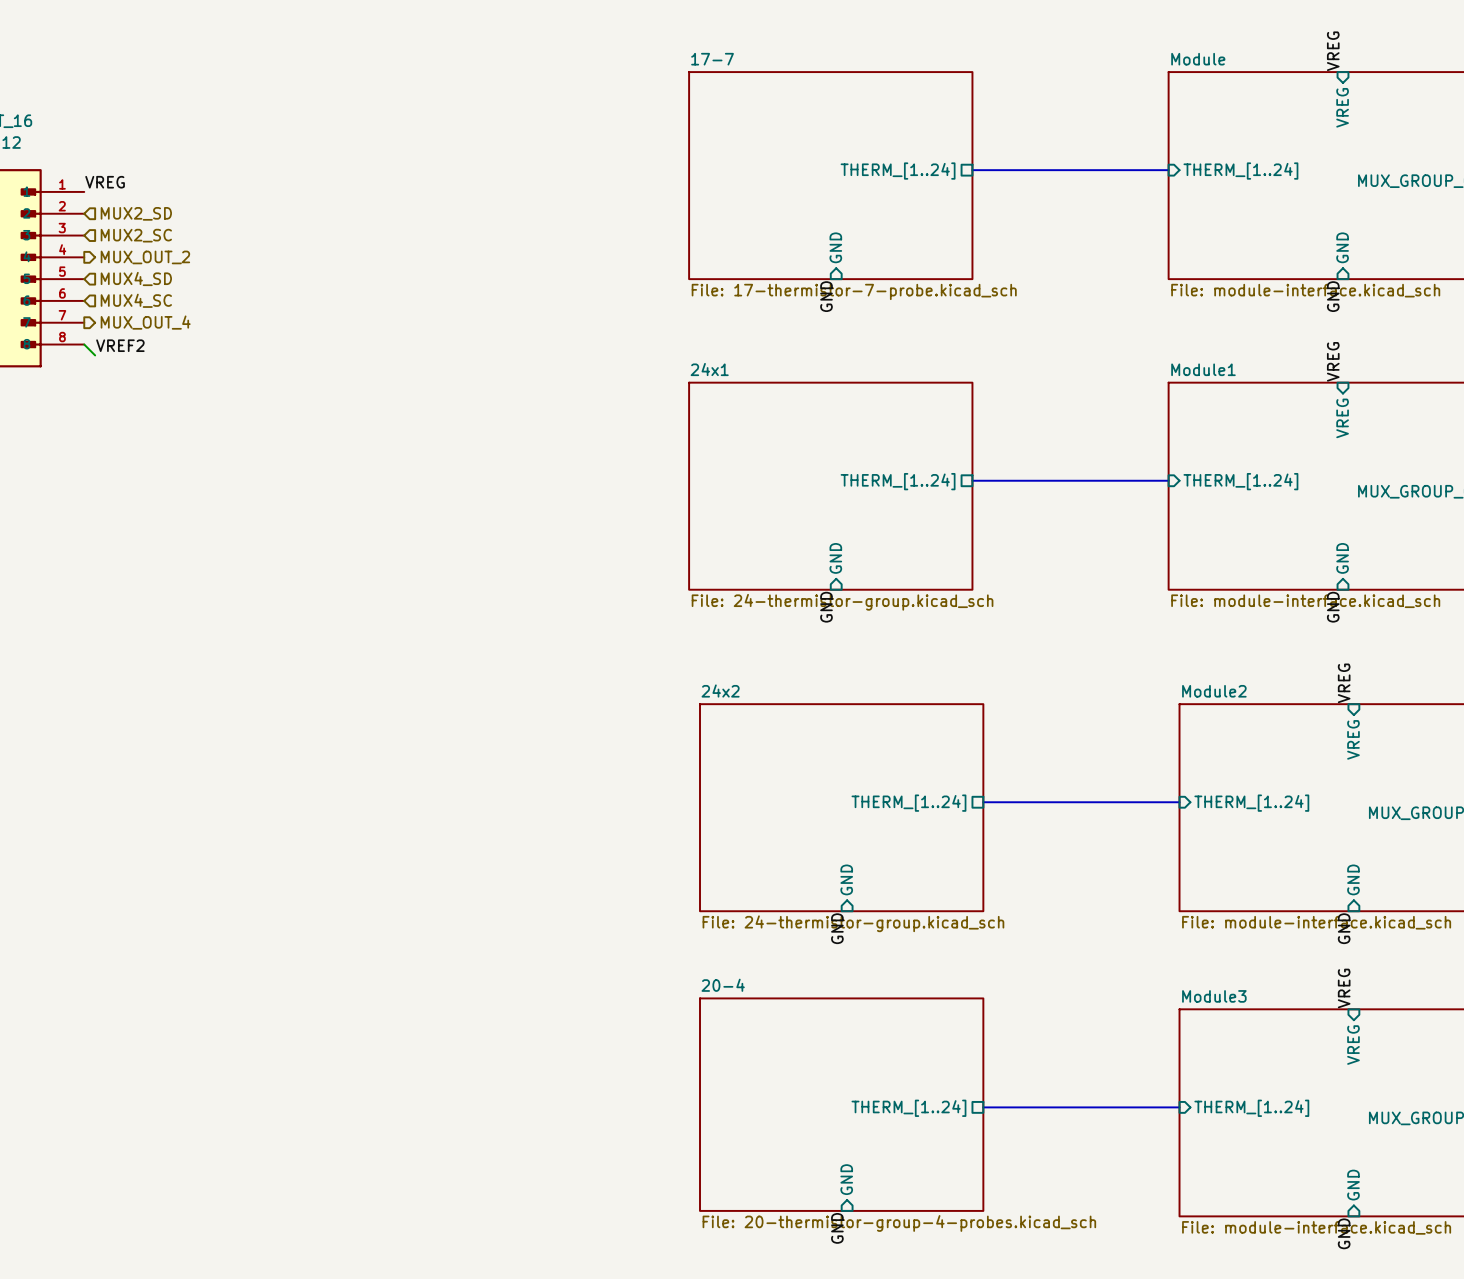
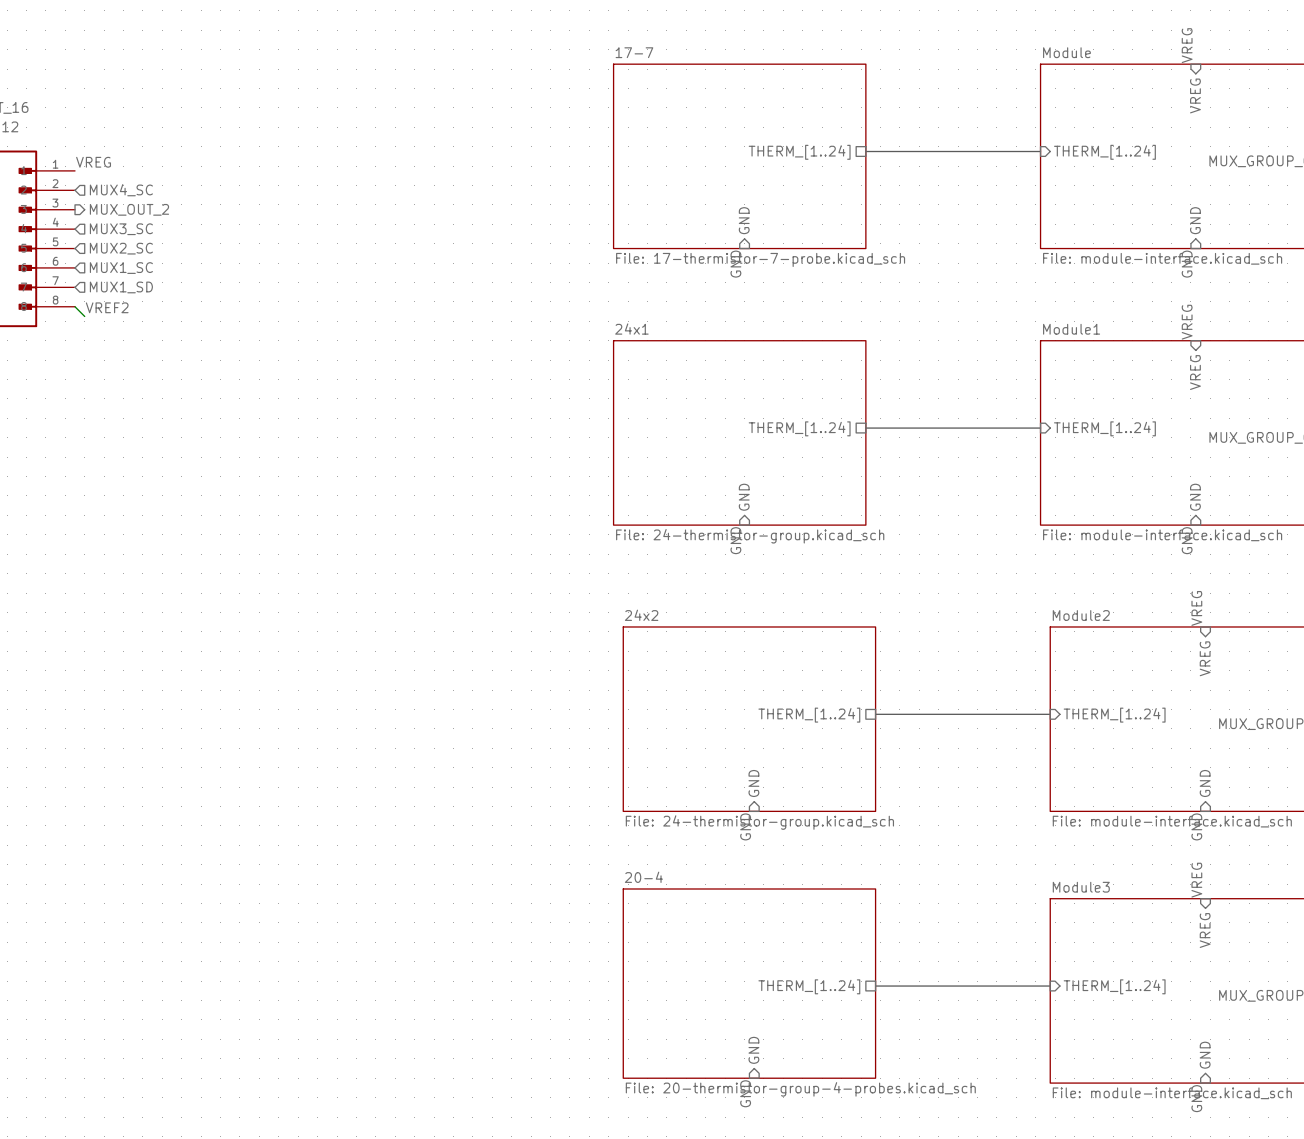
hierarchical label: MUX2_SD (136, 213) -> MUX4_SC (121, 190)
hierarchical label shape: input (136, 235) -> output (129, 209)
hierarchical label: MUX2_SC (136, 235) -> MUX_OUT_2 (129, 209)
hierarchical label shape: output (145, 257) -> input (121, 229)
hierarchical label: MUX_OUT_2 (145, 257) -> MUX3_SC (121, 229)
hierarchical label: MUX4_SD (136, 278) -> MUX2_SC (121, 248)
hierarchical label: MUX4_SC (136, 300) -> MUX1_SC (121, 268)
hierarchical label shape: output (145, 322) -> input (121, 287)
hierarchical label: MUX_OUT_4 (145, 322) -> MUX1_SD (121, 287)

